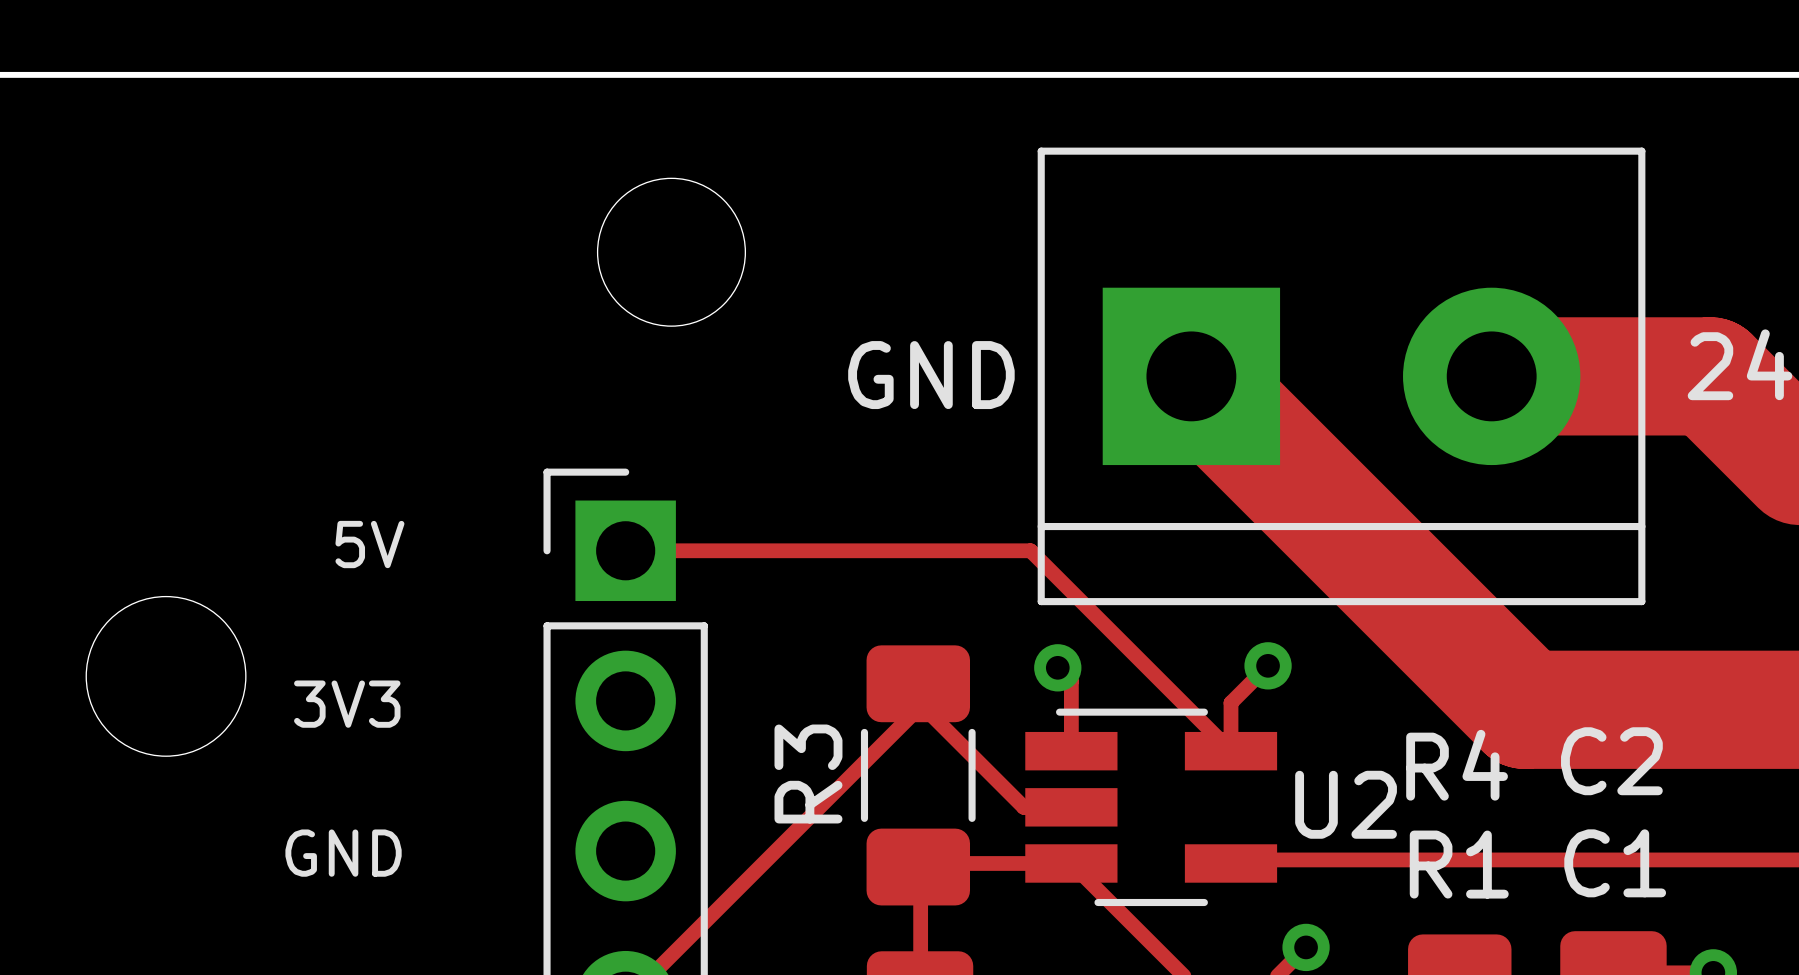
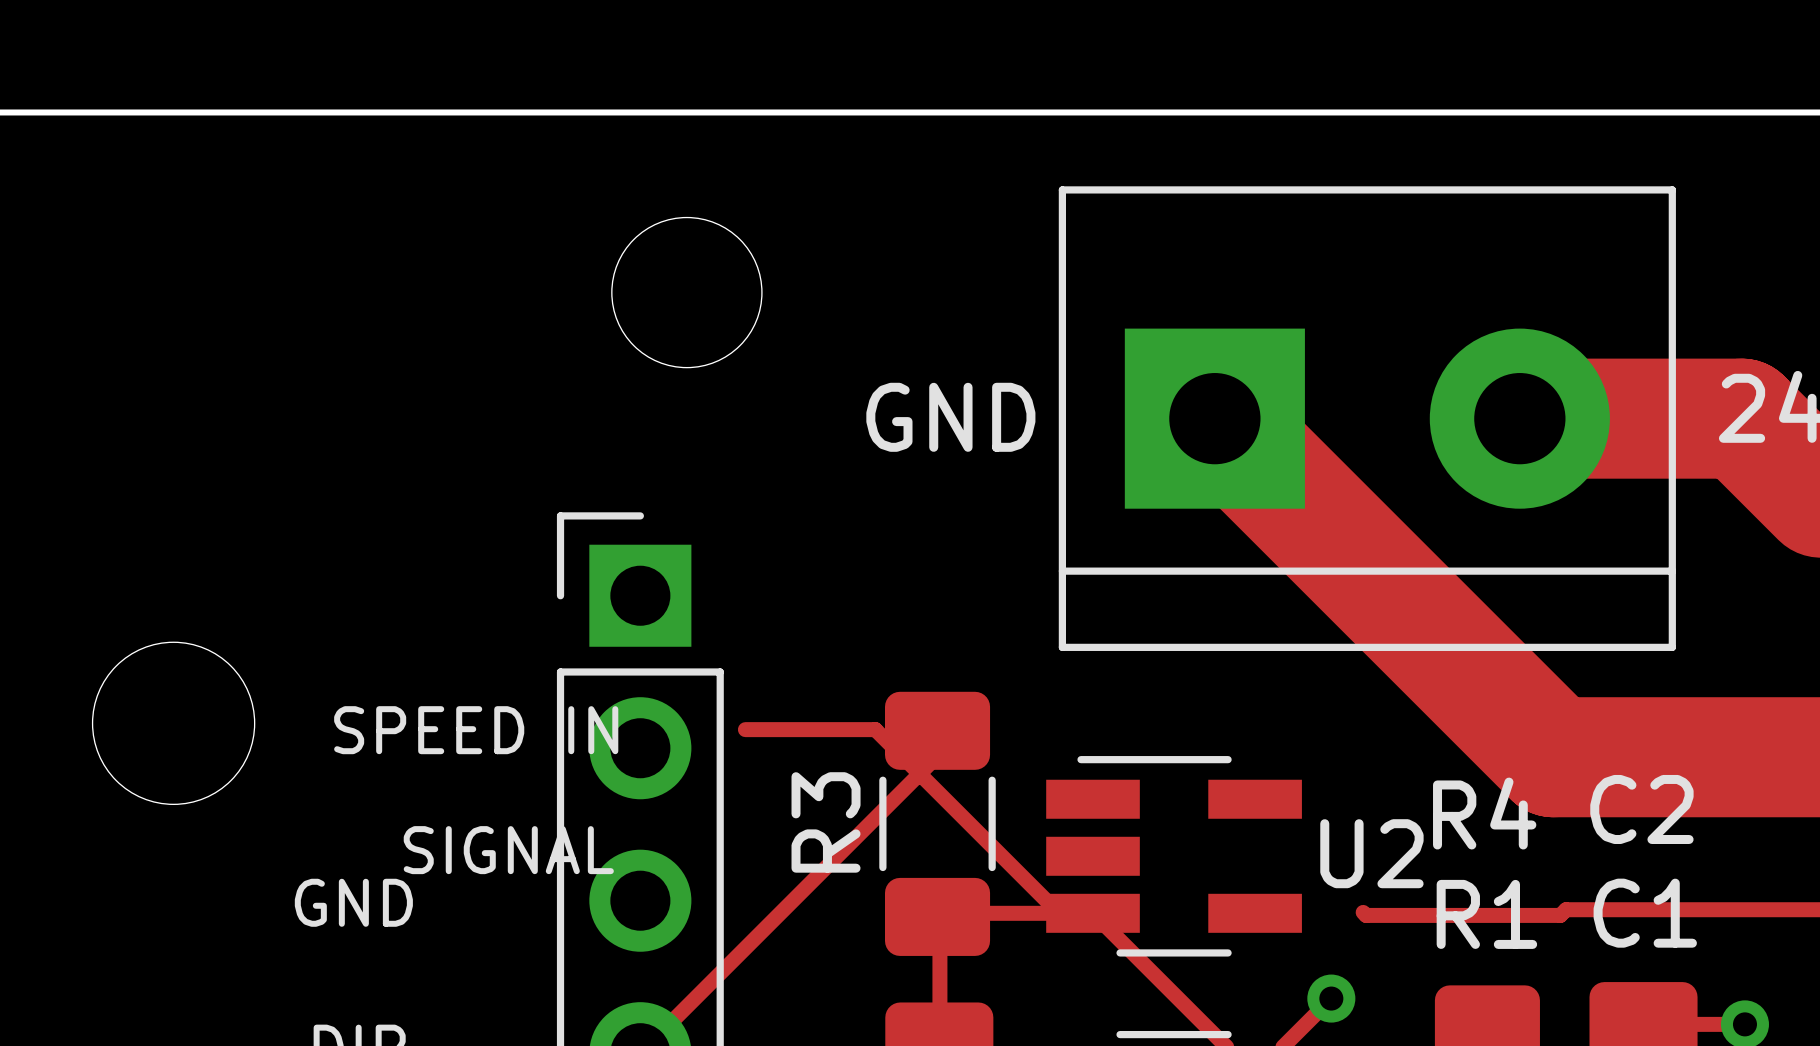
text: 5V (369, 544) -> none
track: (625, 550) (1030, 550) (1230, 751) (1230, 702) (1268, 665) -> none
via: (1268, 665) -> none
track: (1057, 667) (1071, 681) (1071, 751) -> none
via: (1057, 667) -> none
track: none -> (745, 729) (875, 729) (1058, 912)
text: none -> SPEED IN (476, 730)
track: (918, 701) (1023, 807) (1071, 807) -> none
text: 3V3 (347, 704) -> none
text: none -> SIGNAL (508, 850)
track: (1537, 859) (1234, 859) (1230, 863) -> (1566, 909) (1560, 915) (1366, 915) (1363, 912)

